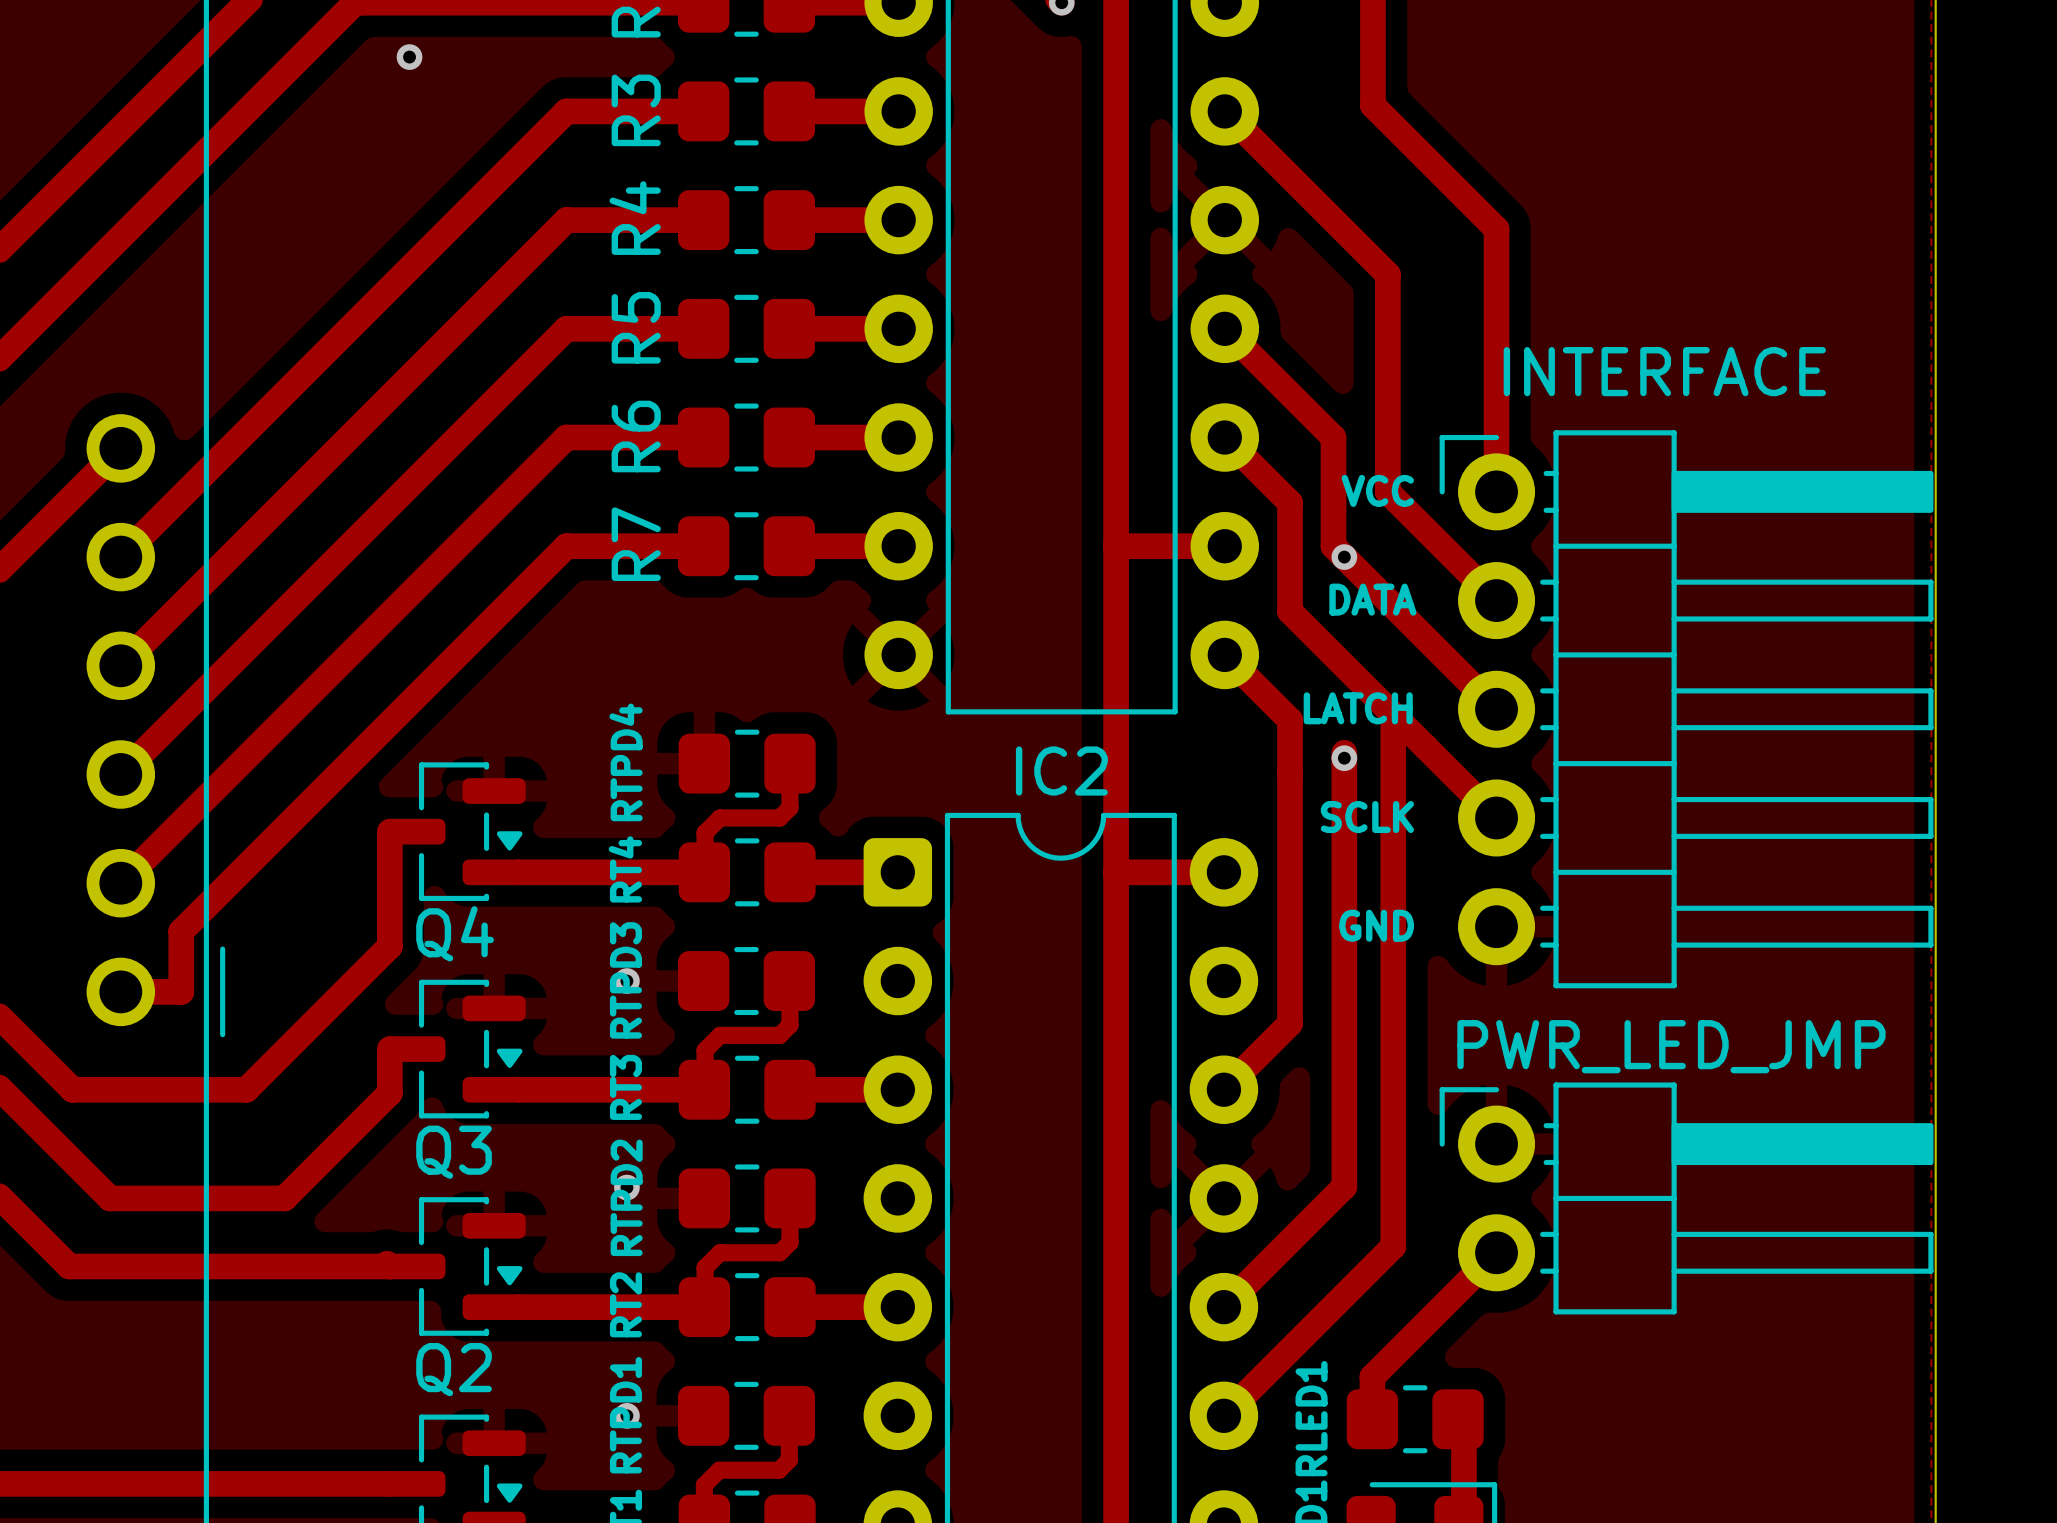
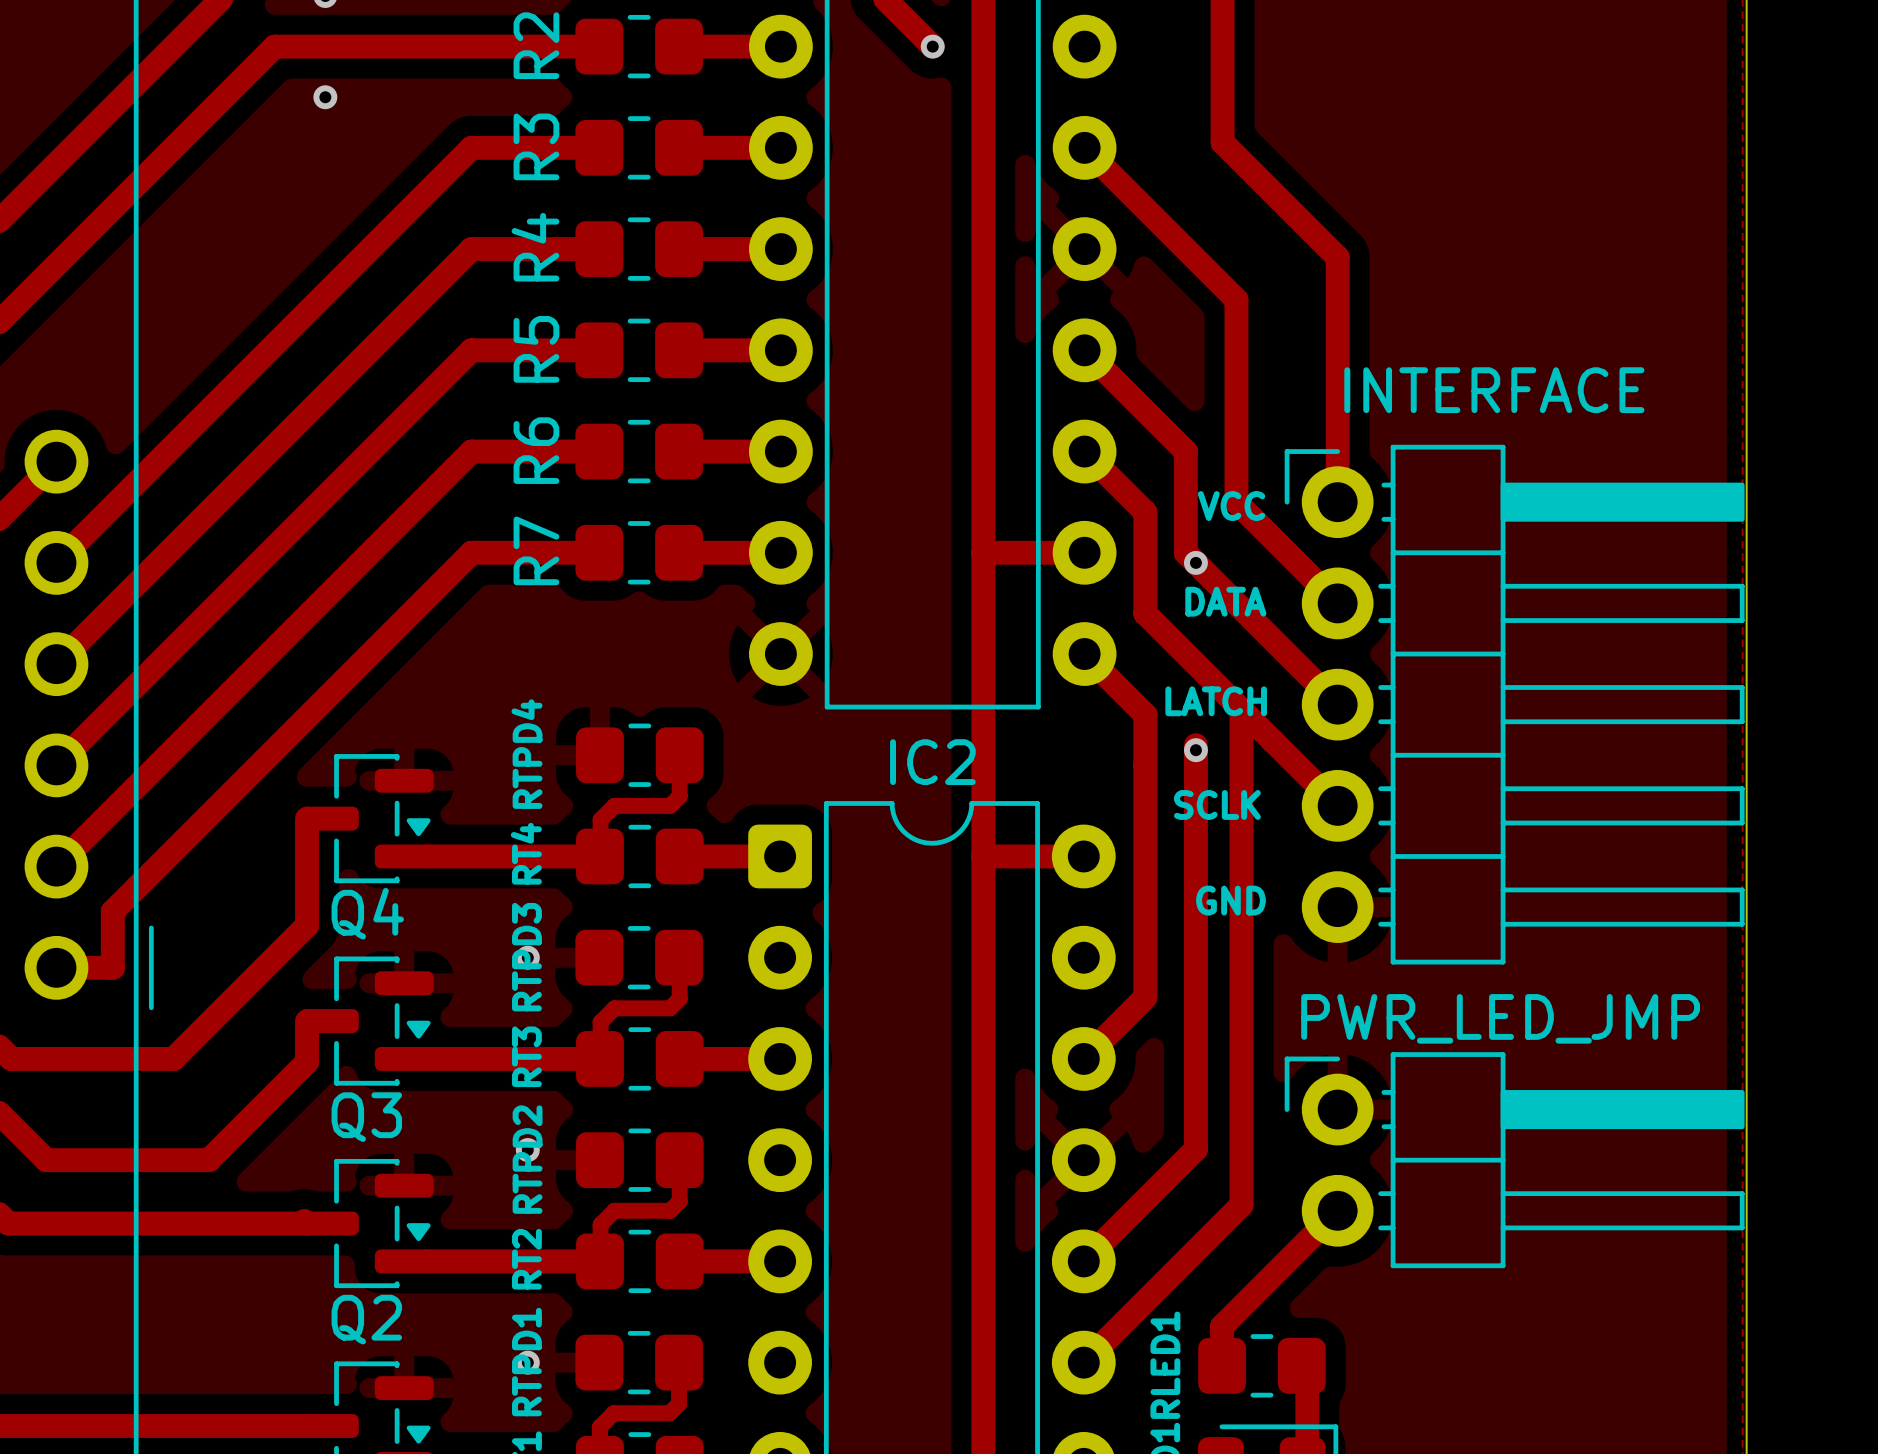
text position: VCC (1377, 490) -> VCC (1231, 506)
text position: DATA (1372, 599) -> DATA (1225, 601)
text position: LATCH (1358, 708) -> LATCH (1216, 701)
text position: GND (1376, 925) -> GND (1230, 900)

